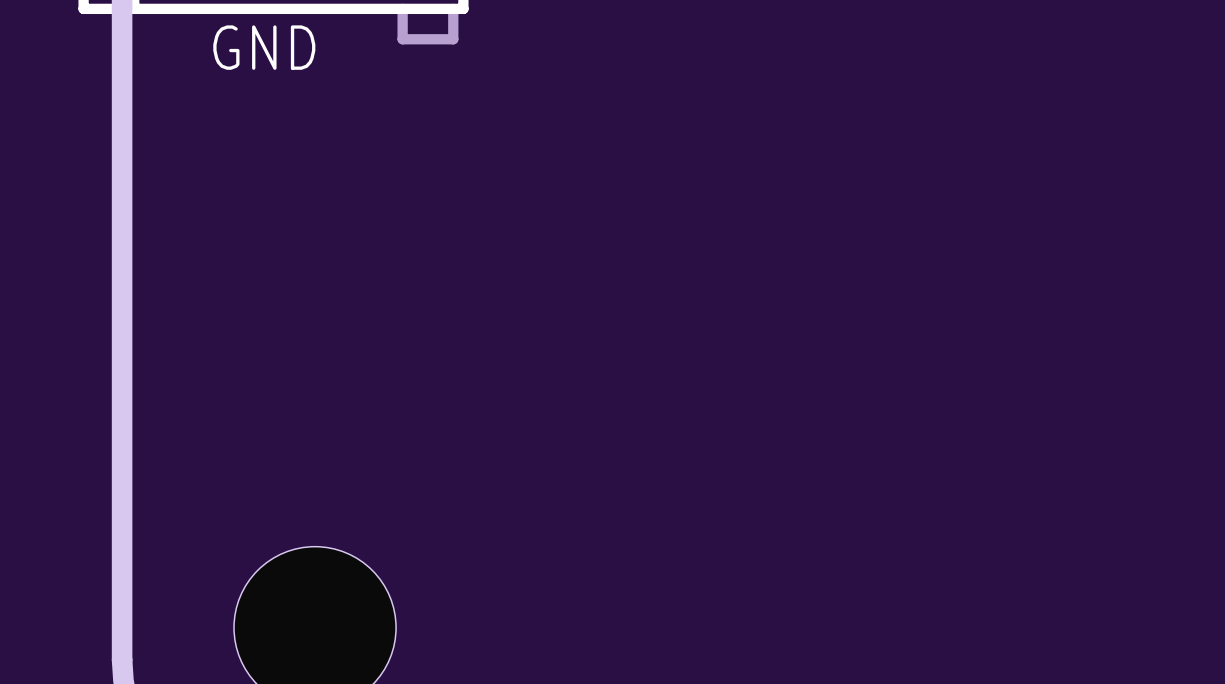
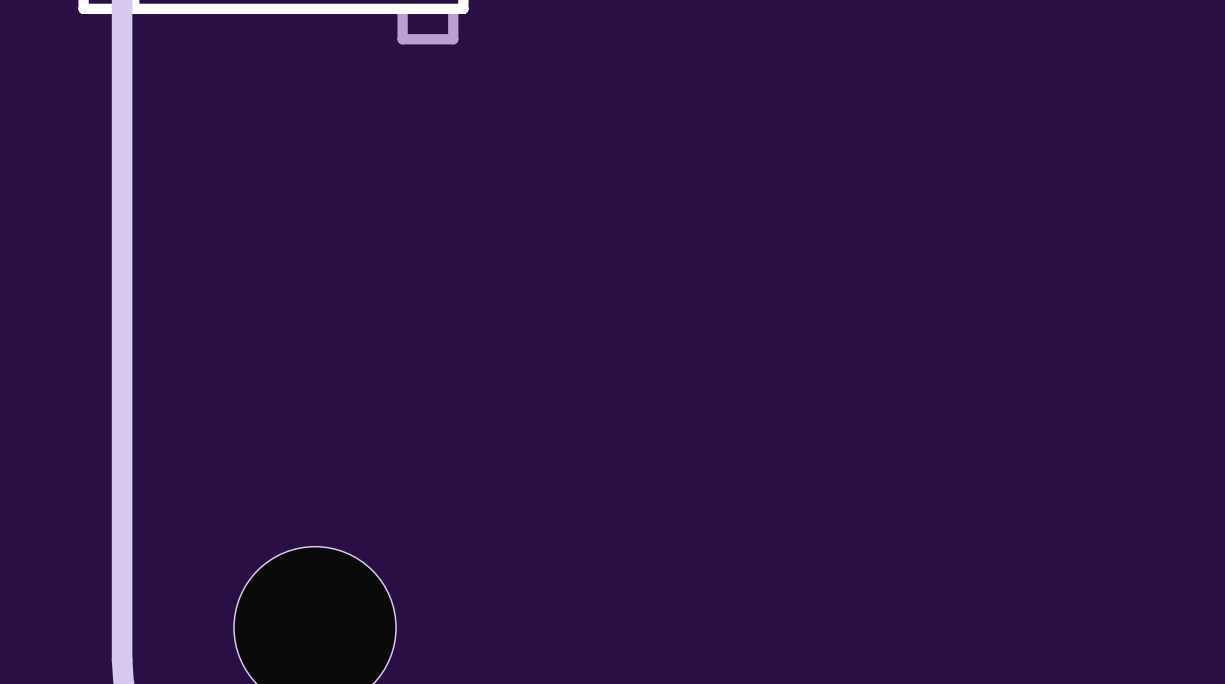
text: GND (264, 47) -> none

